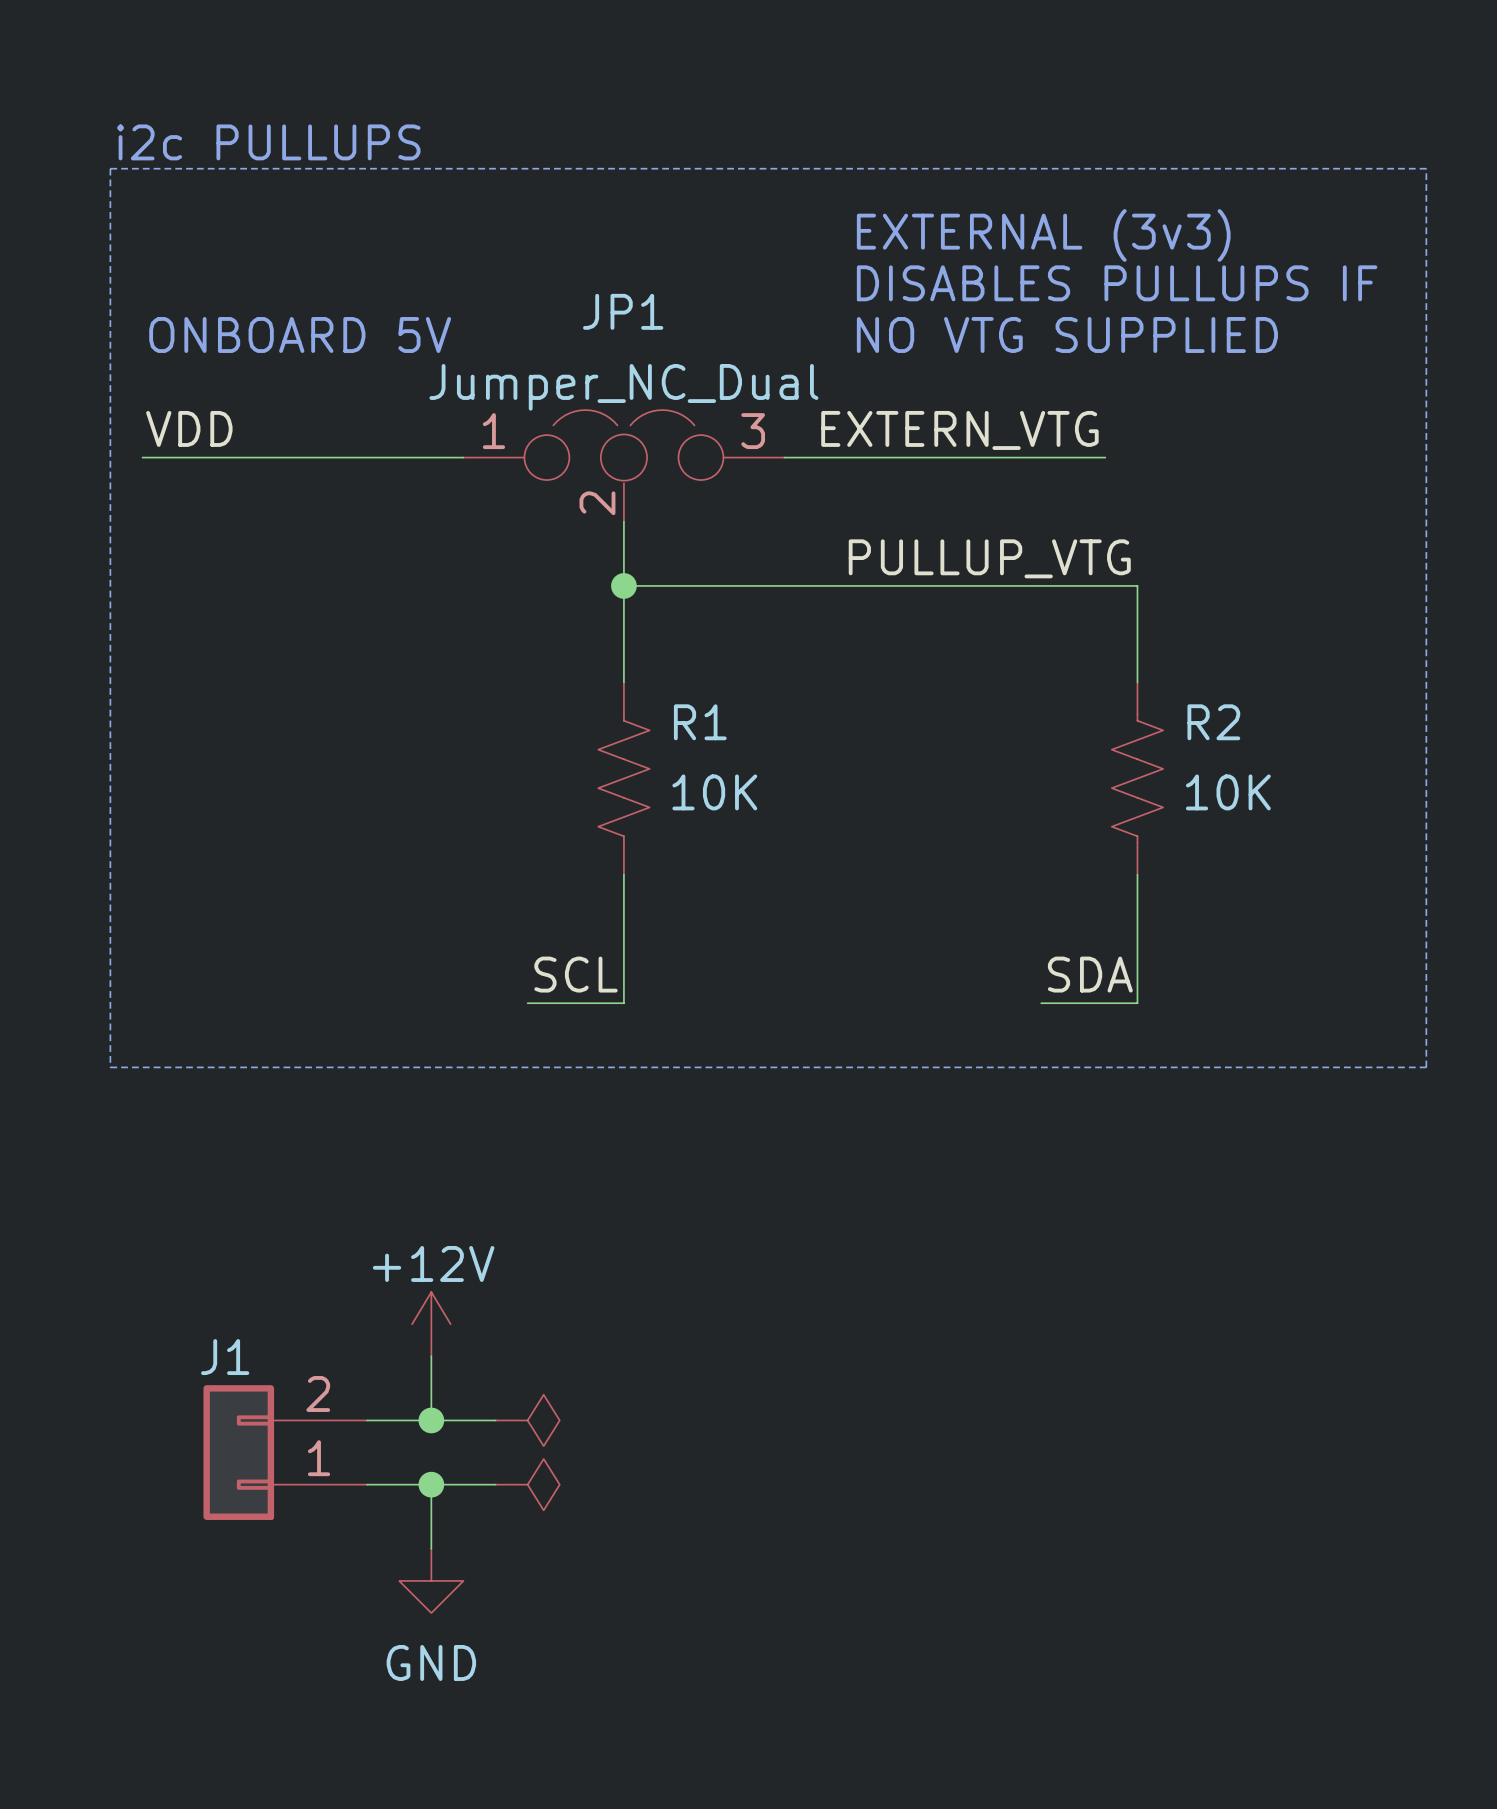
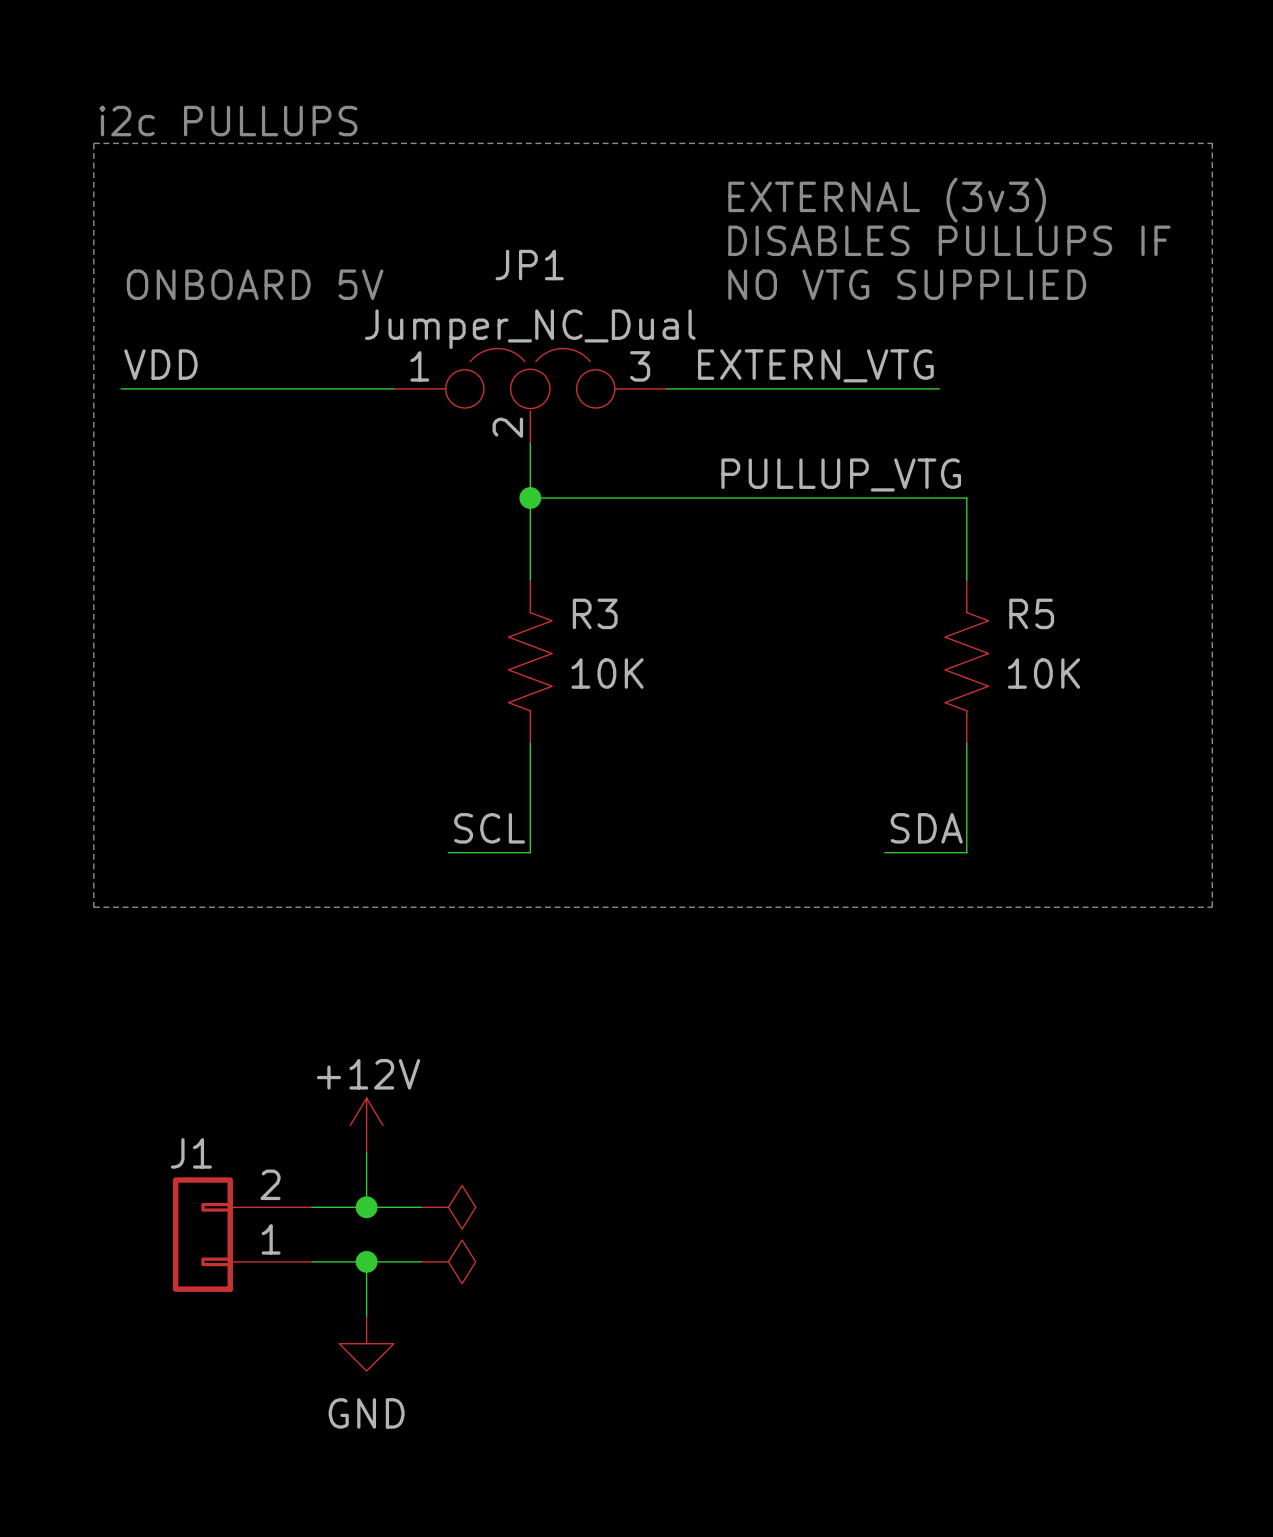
R1 name: R1 (700, 722) -> R3 (595, 613)
R2 name: R2 (1213, 722) -> R5 (1031, 613)

